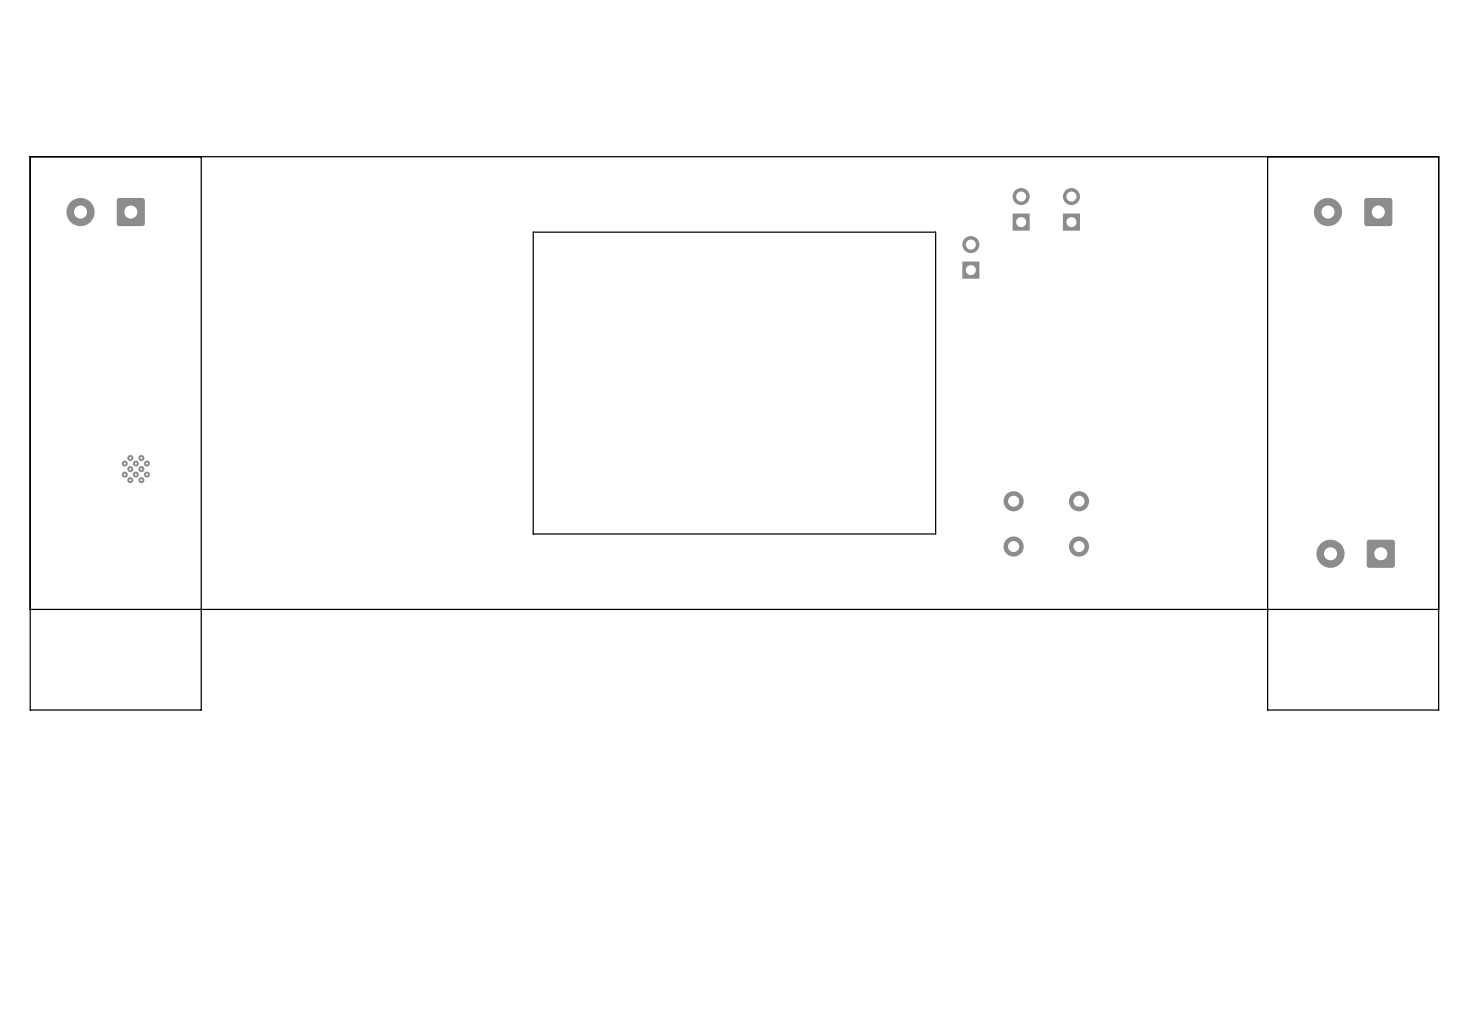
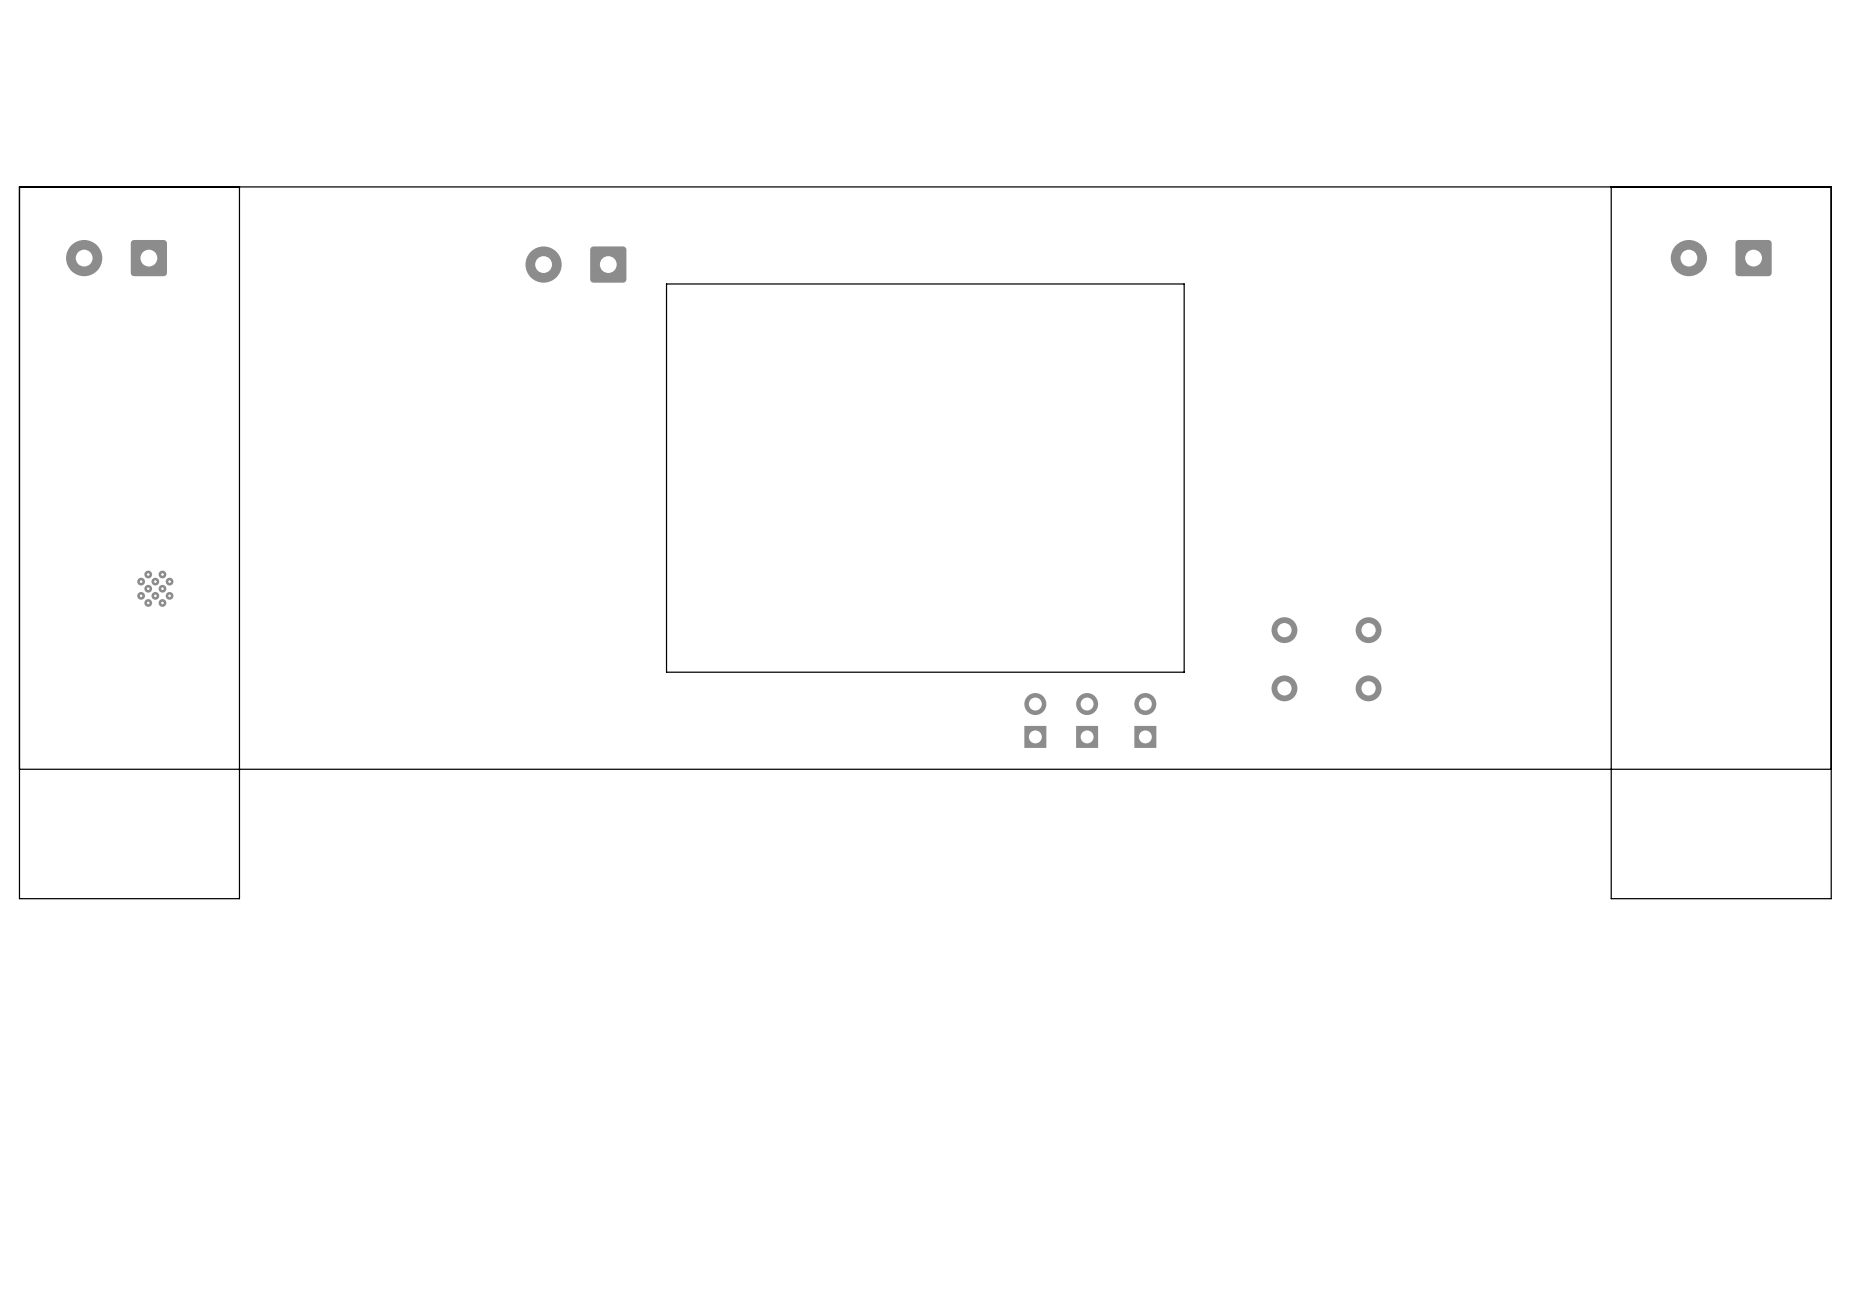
part: (1021, 209) -> none
part: (1071, 209) -> none
part: none -> (575, 264)
part: (970, 257) -> none
part: (1355, 553) -> none
part: none -> (1035, 720)
part: none -> (1087, 720)
part: none -> (1145, 720)

